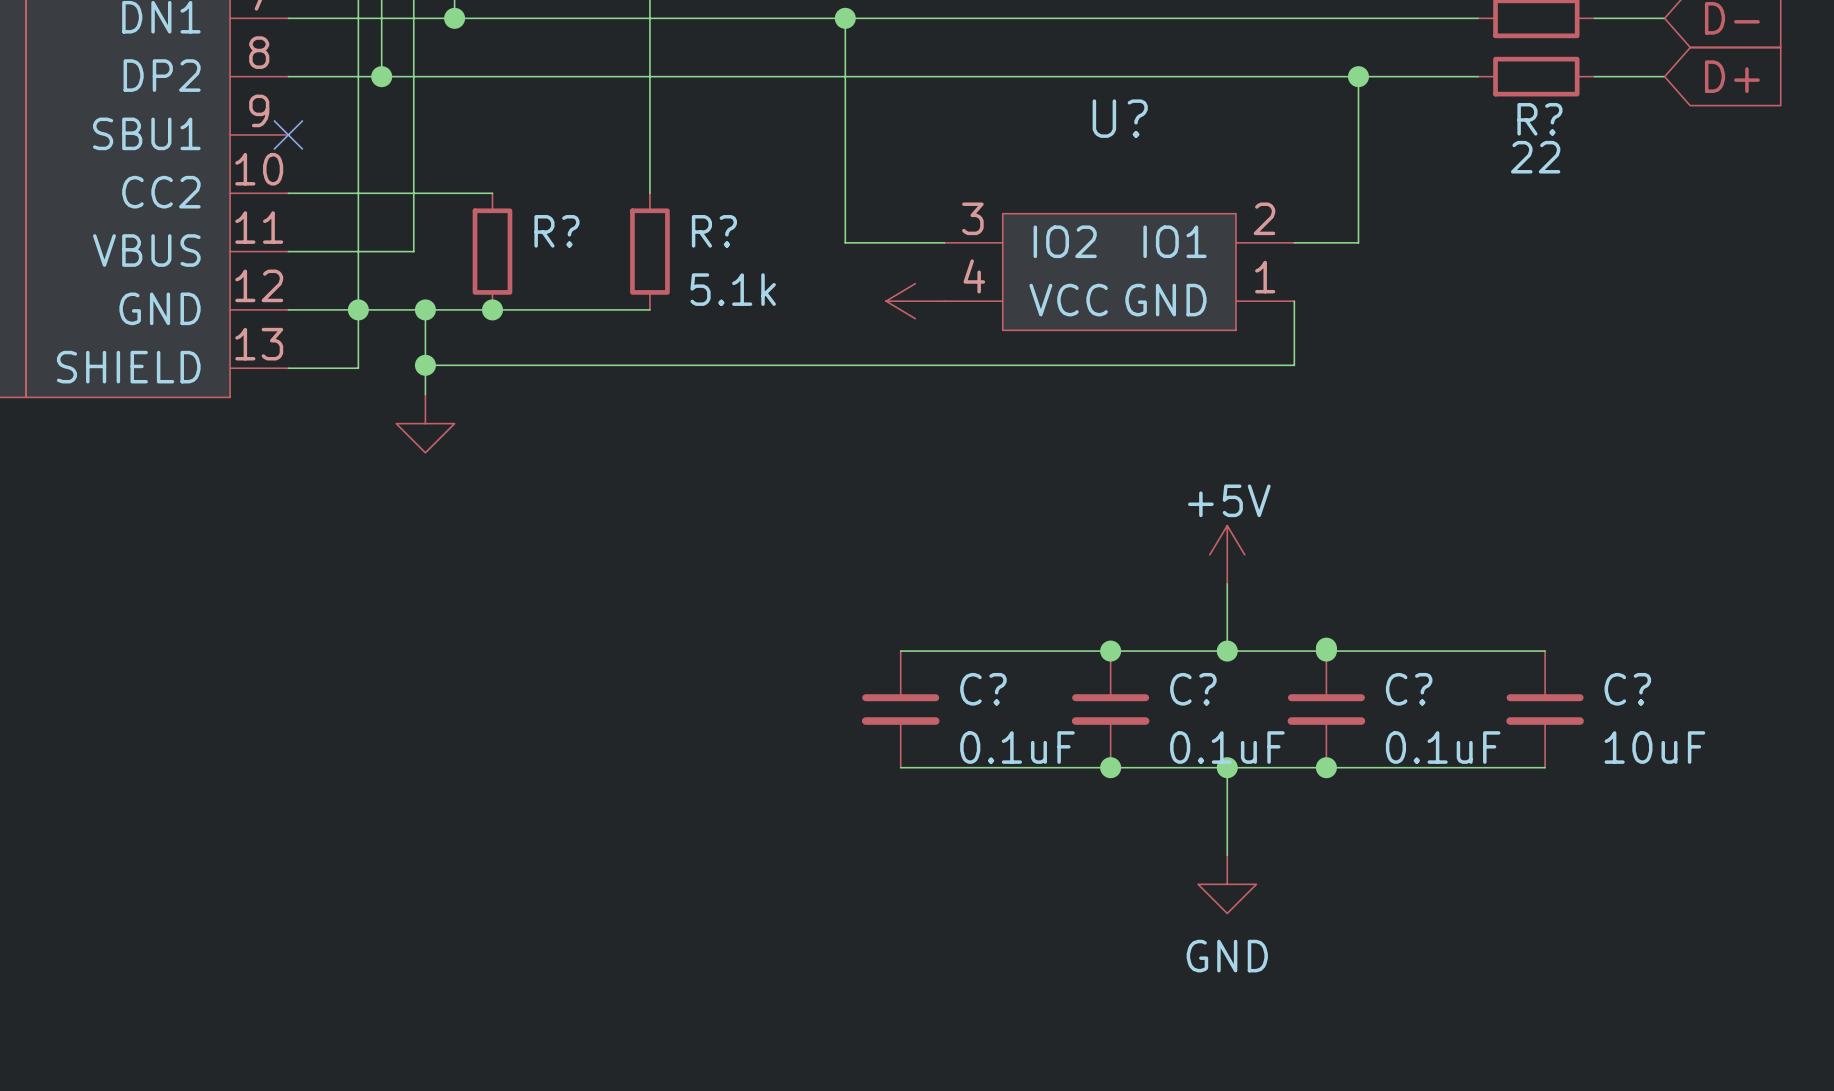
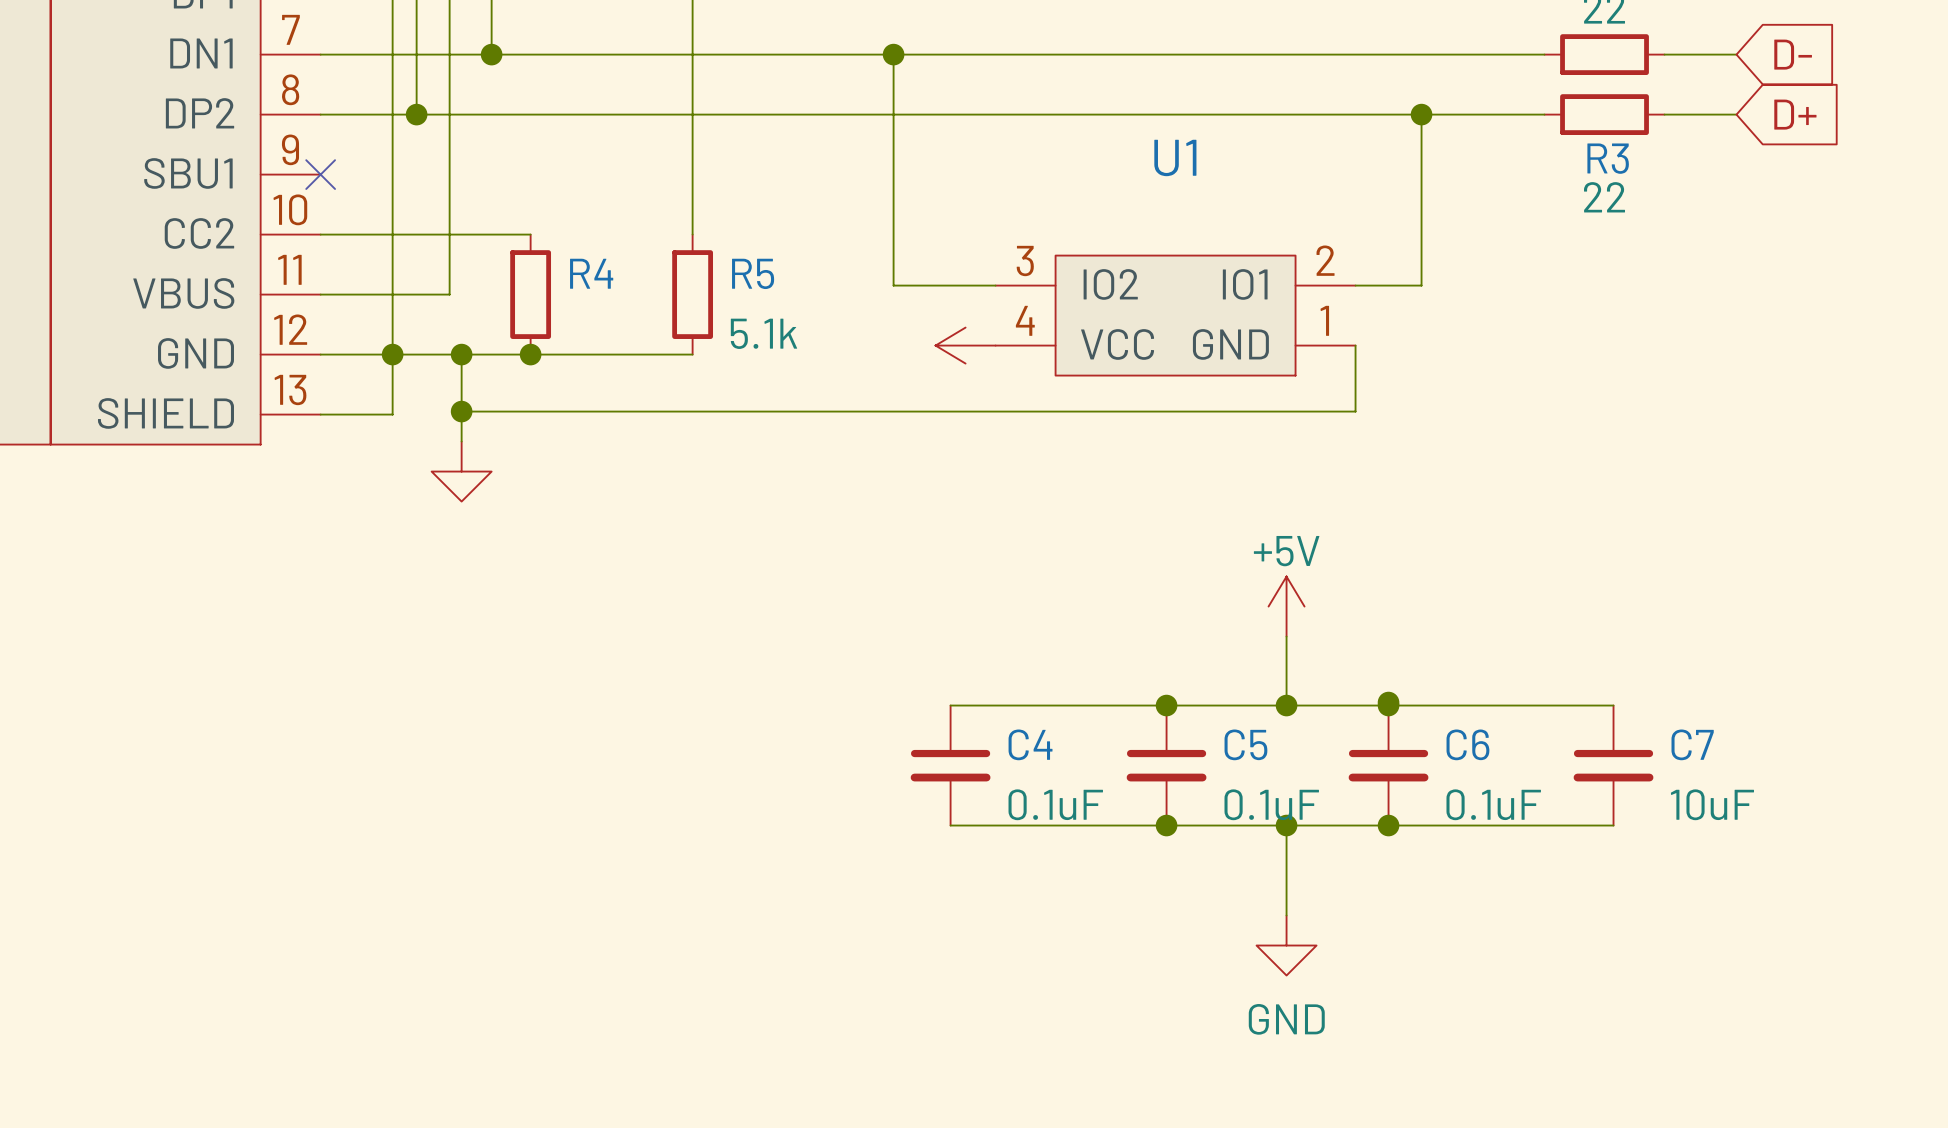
U? name: U? (1120, 118) -> U1 (1175, 157)
R? name: R? (1539, 119) -> R3 (1608, 158)
R? name: R? (556, 231) -> R4 (591, 273)
R? name: R? (714, 231) -> R5 (753, 273)
C? name: C? (983, 689) -> C4 (1030, 744)
C? name: C? (1193, 689) -> C5 (1245, 744)
C? name: C? (1409, 689) -> C6 (1467, 744)
C? name: C? (1627, 689) -> C7 (1692, 744)

